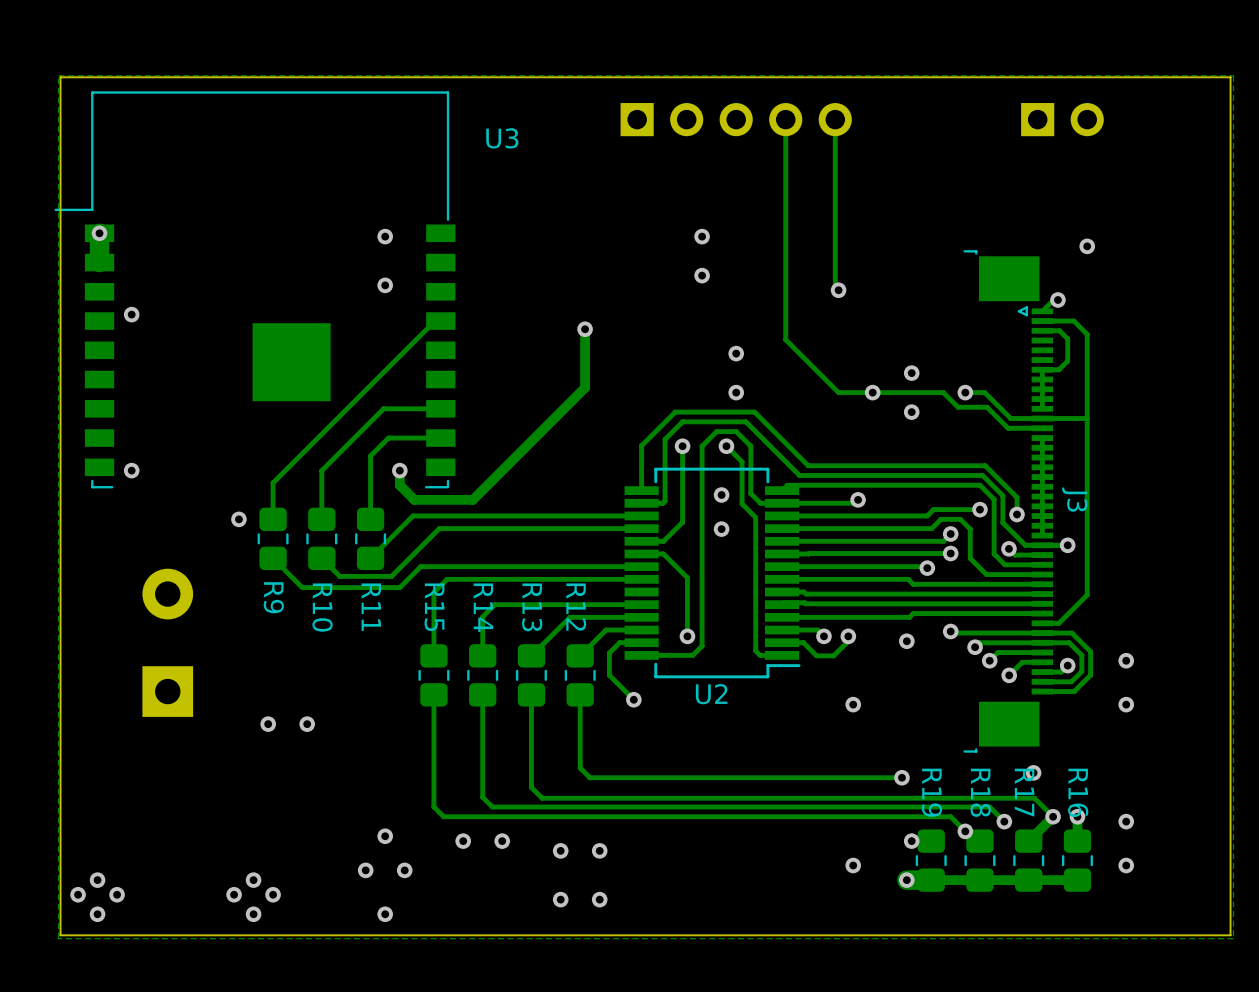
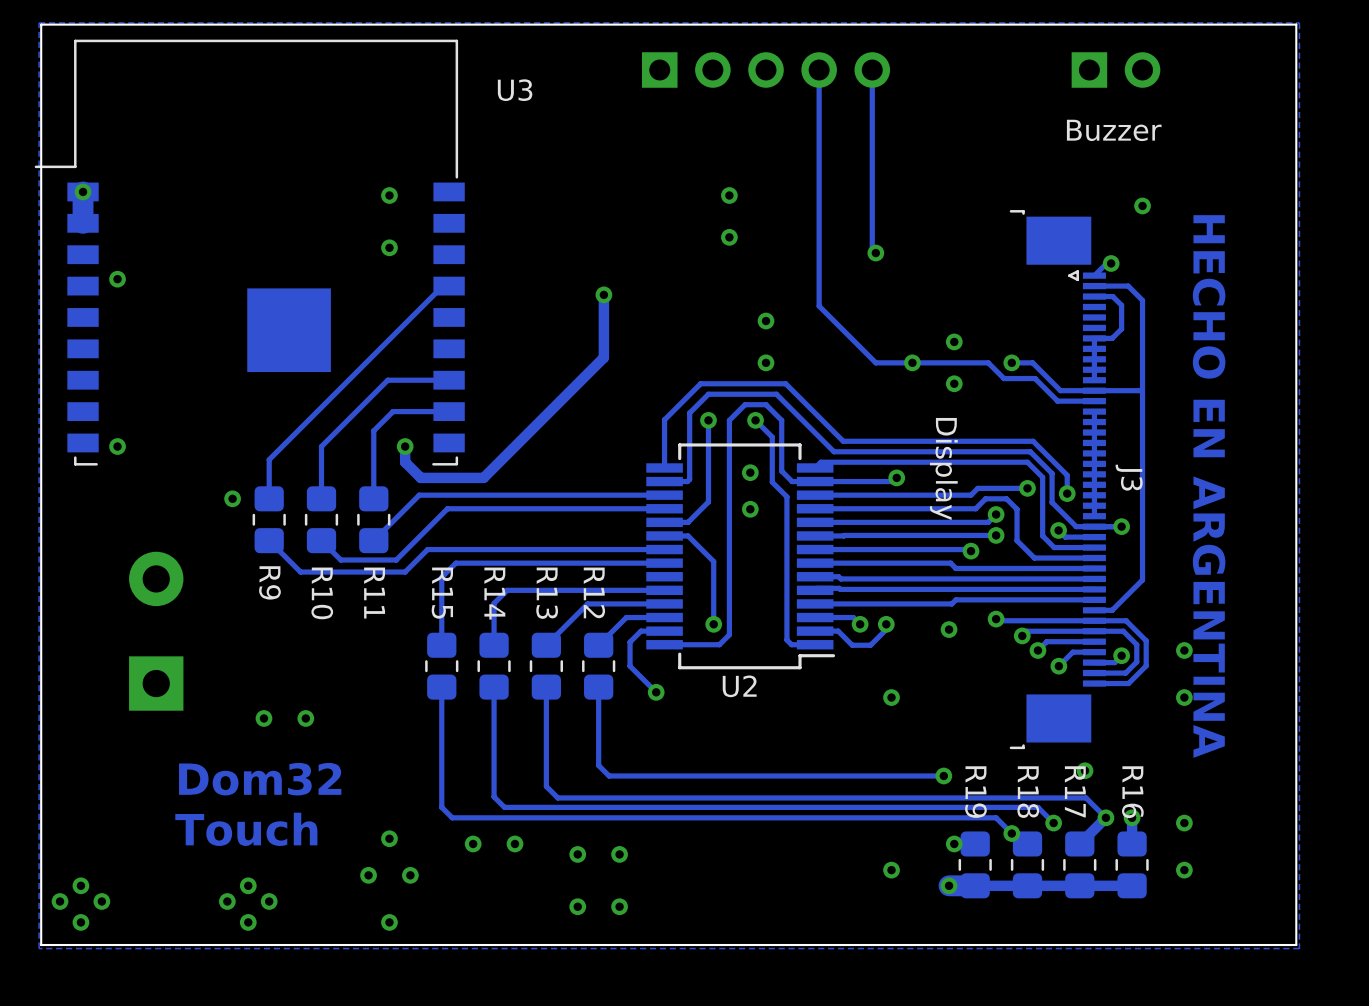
text: none -> Buzzer (1114, 130)
text: none -> Display (943, 469)
text: none -> HECHO EN ARGENTINA (1209, 486)
text: none -> Dom32 (260, 779)
text: none -> Touch (246, 829)

